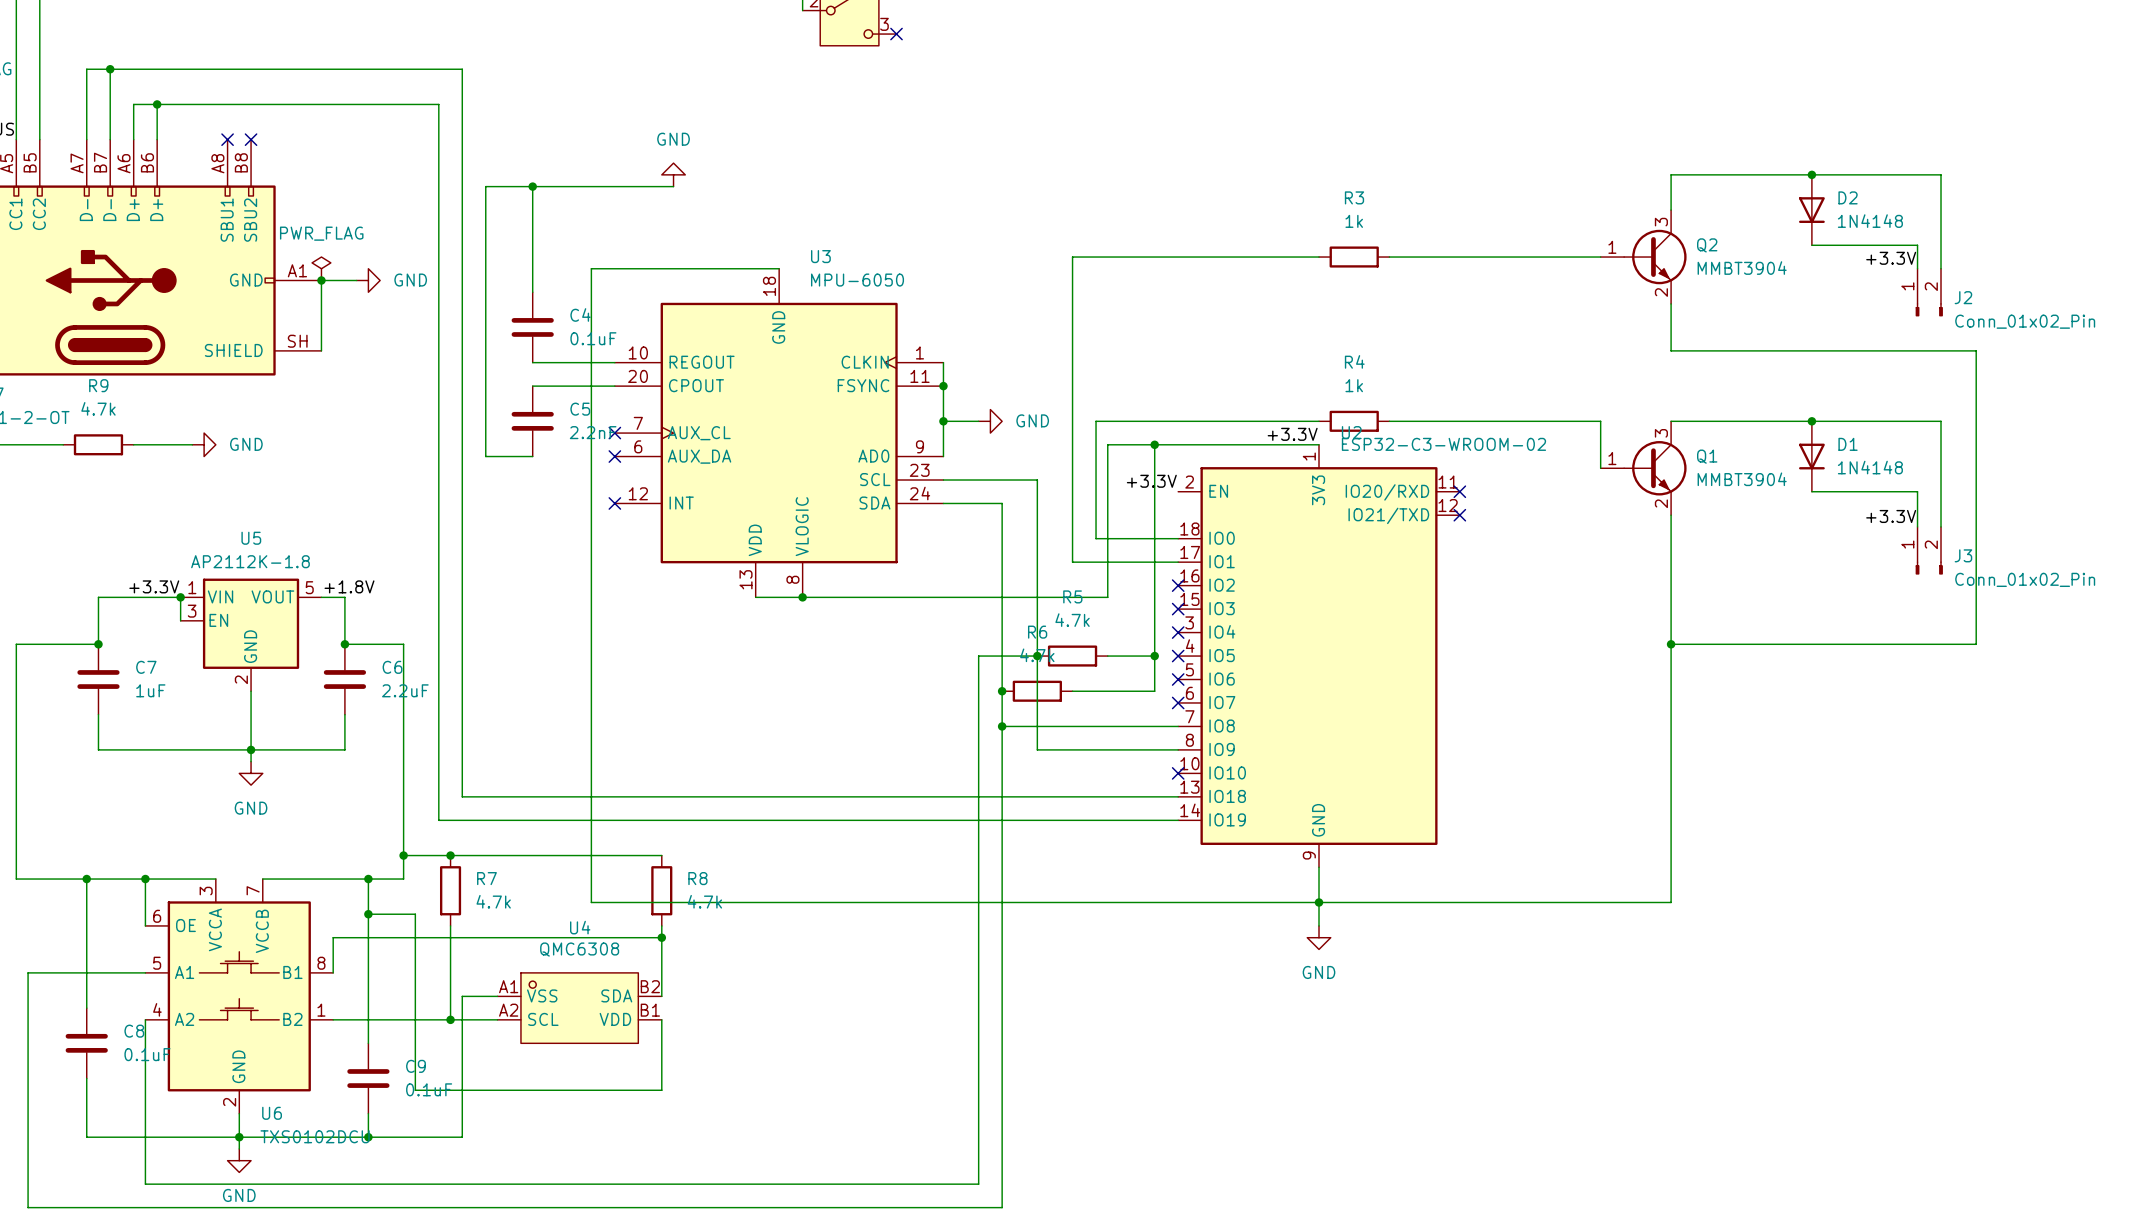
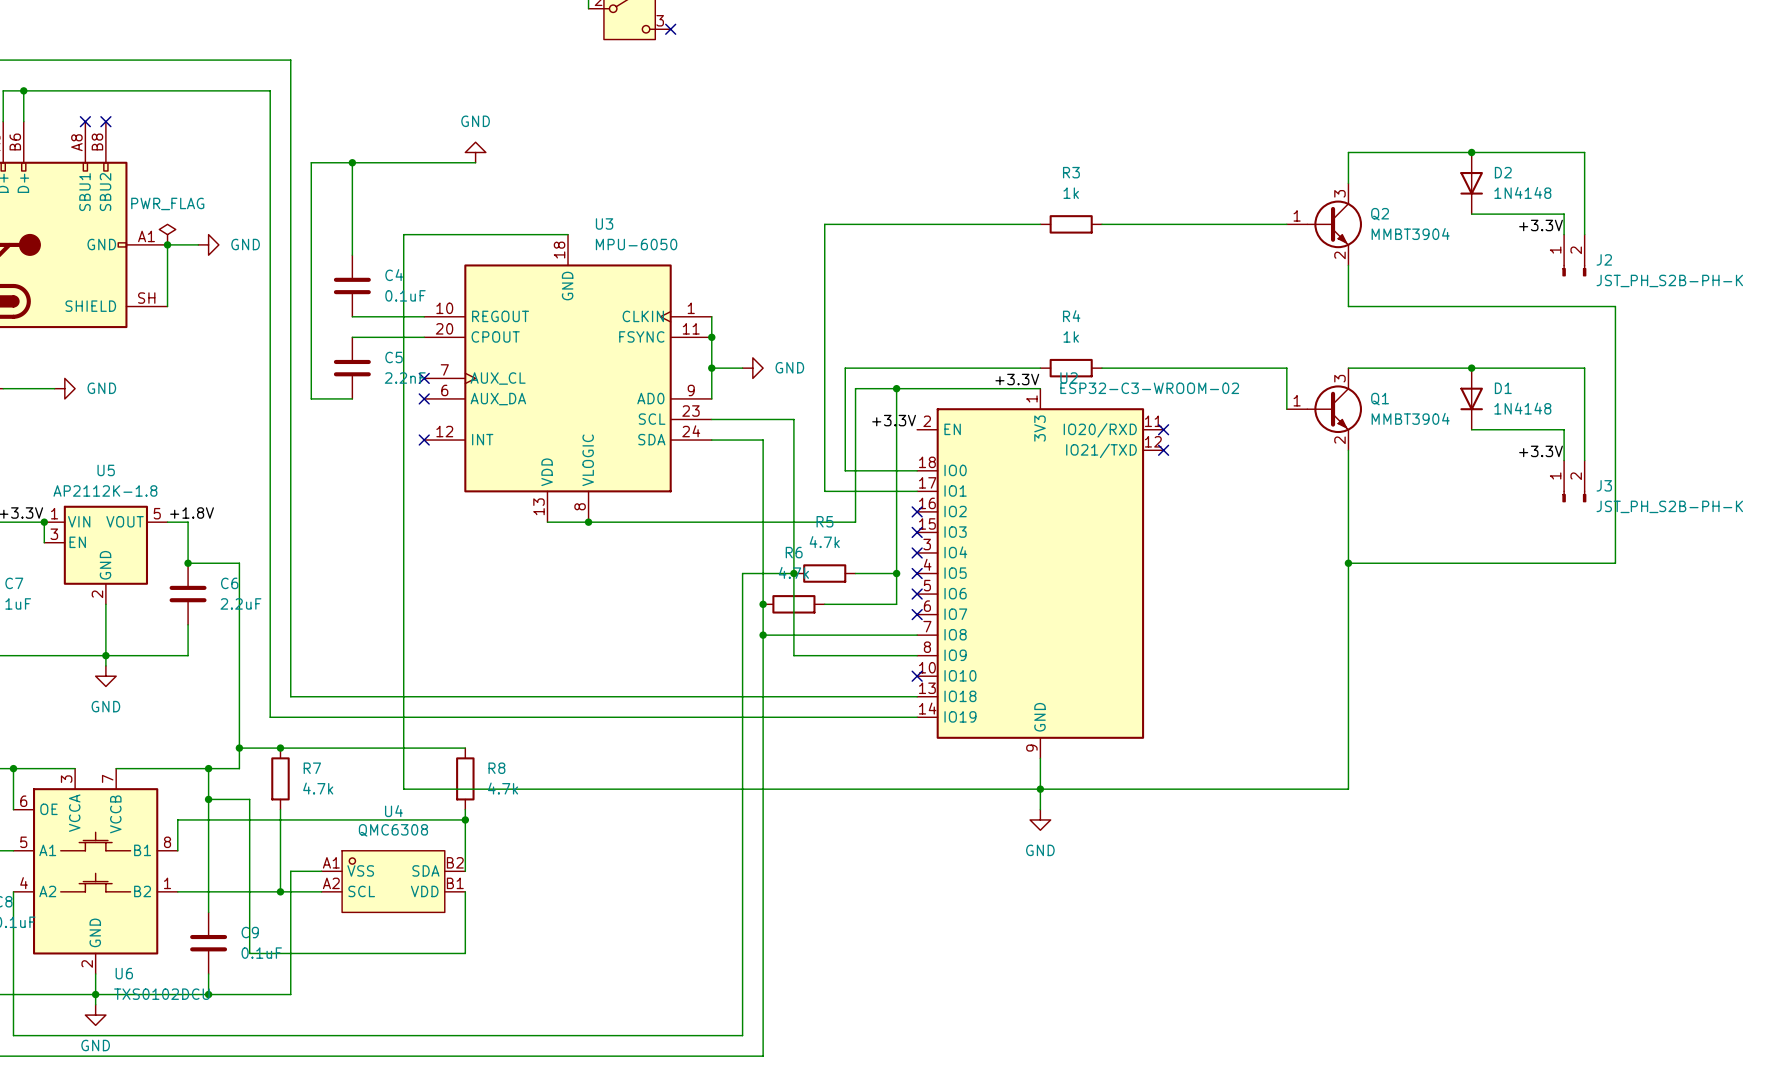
J2 value: Conn_01x02_Pin (2025, 321) -> JST_PH_S2B-PH-K (1669, 280)
J3 value: Conn_01x02_Pin (2025, 579) -> JST_PH_S2B-PH-K (1669, 506)

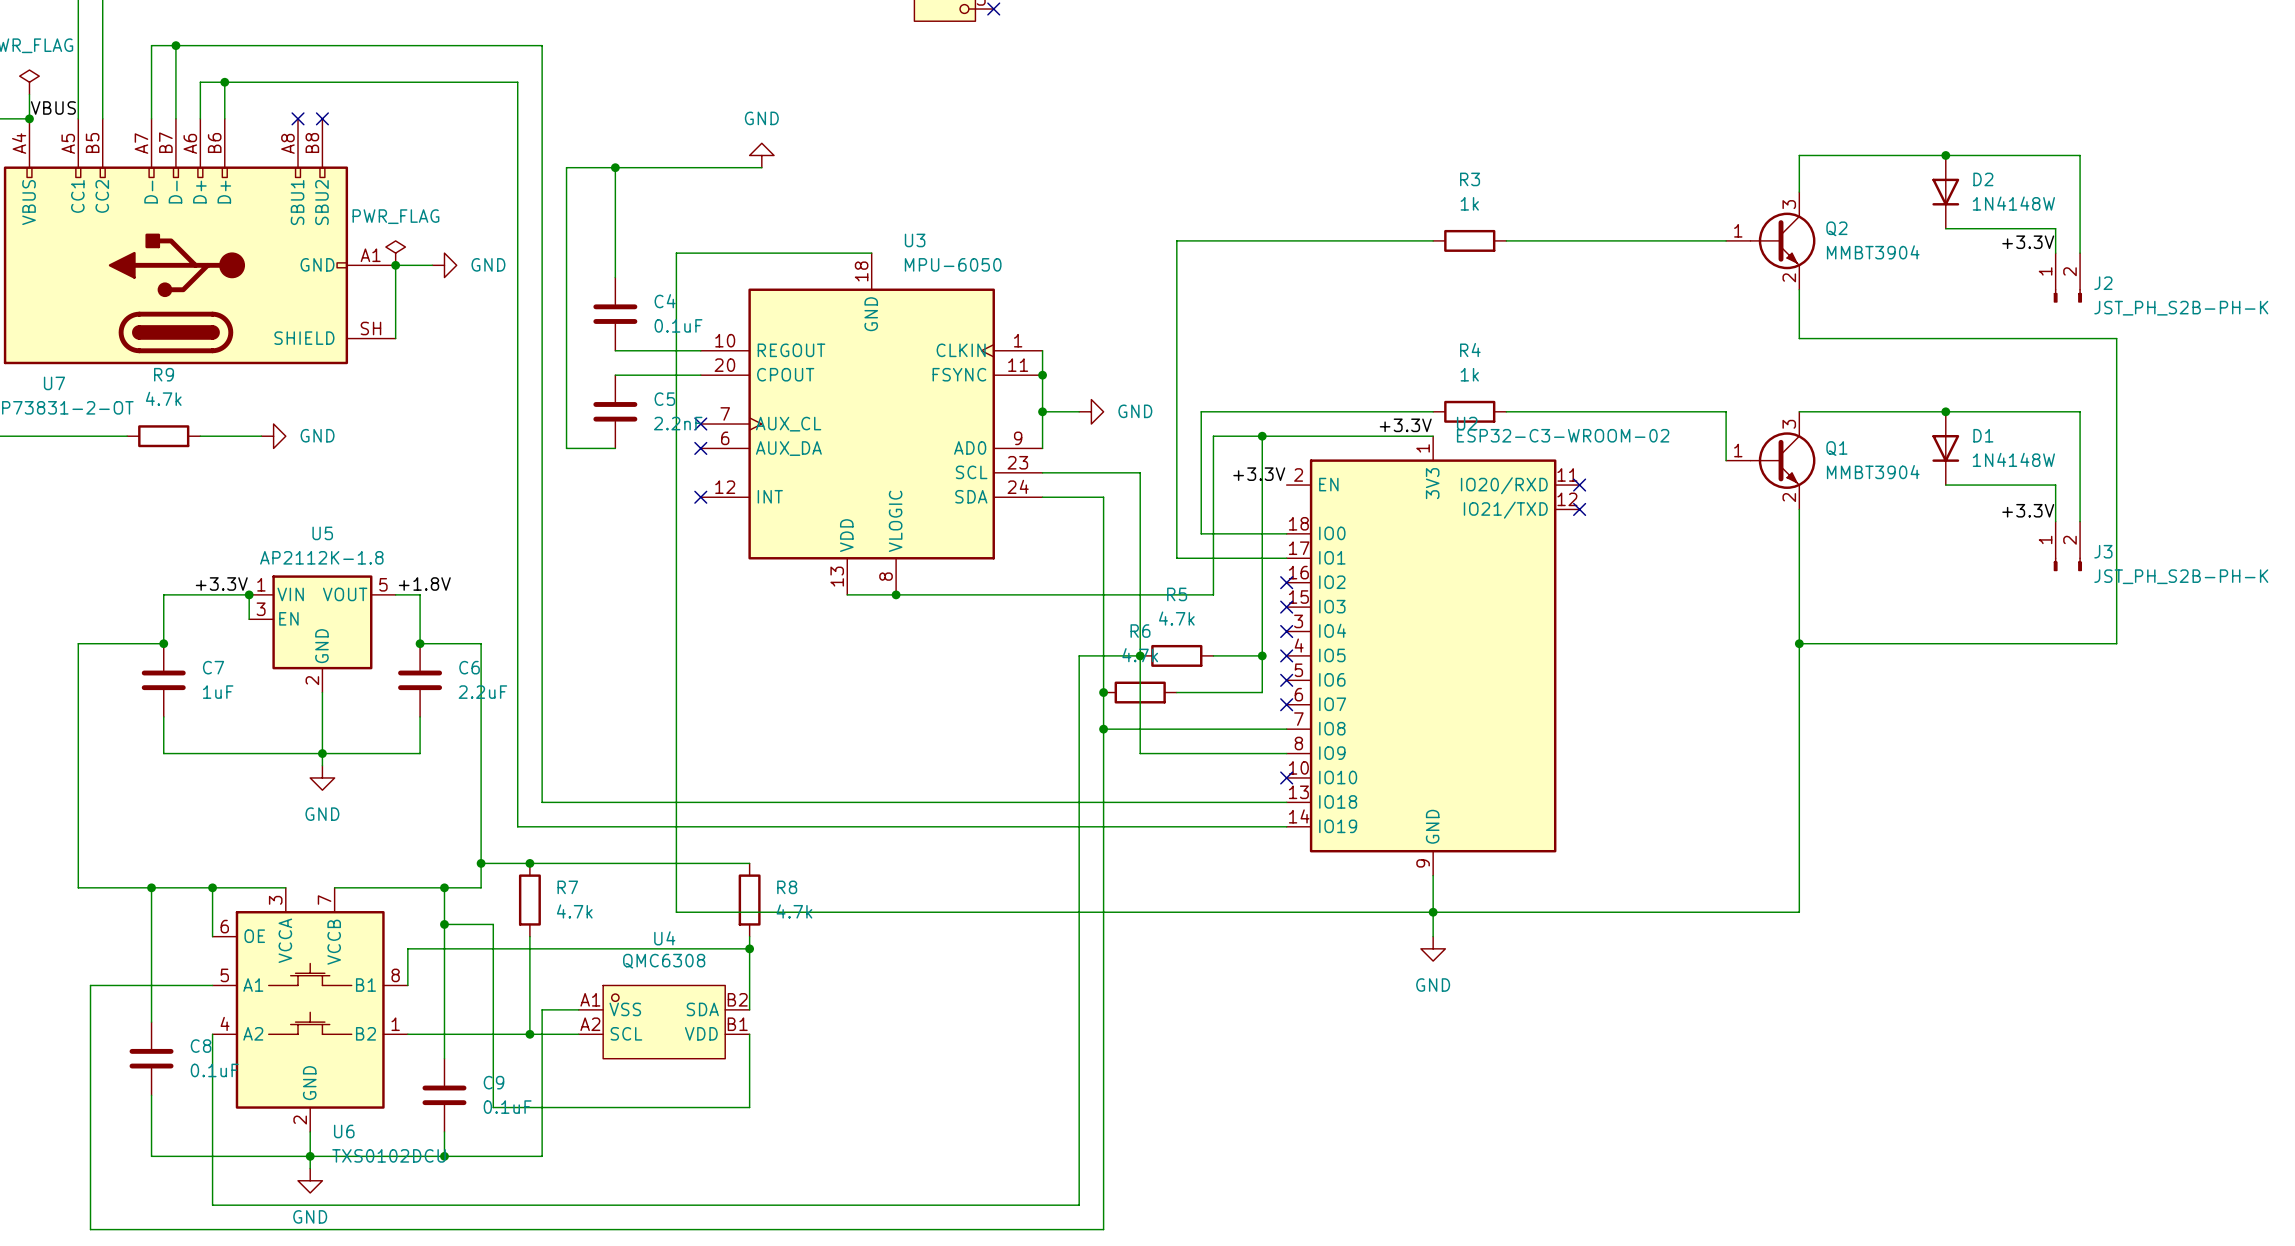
D2 value: 1N4148 (1522, 192) -> 1N4148W (2013, 203)
D1 value: 1N4148 (1522, 408) -> 1N4148W (2013, 459)

